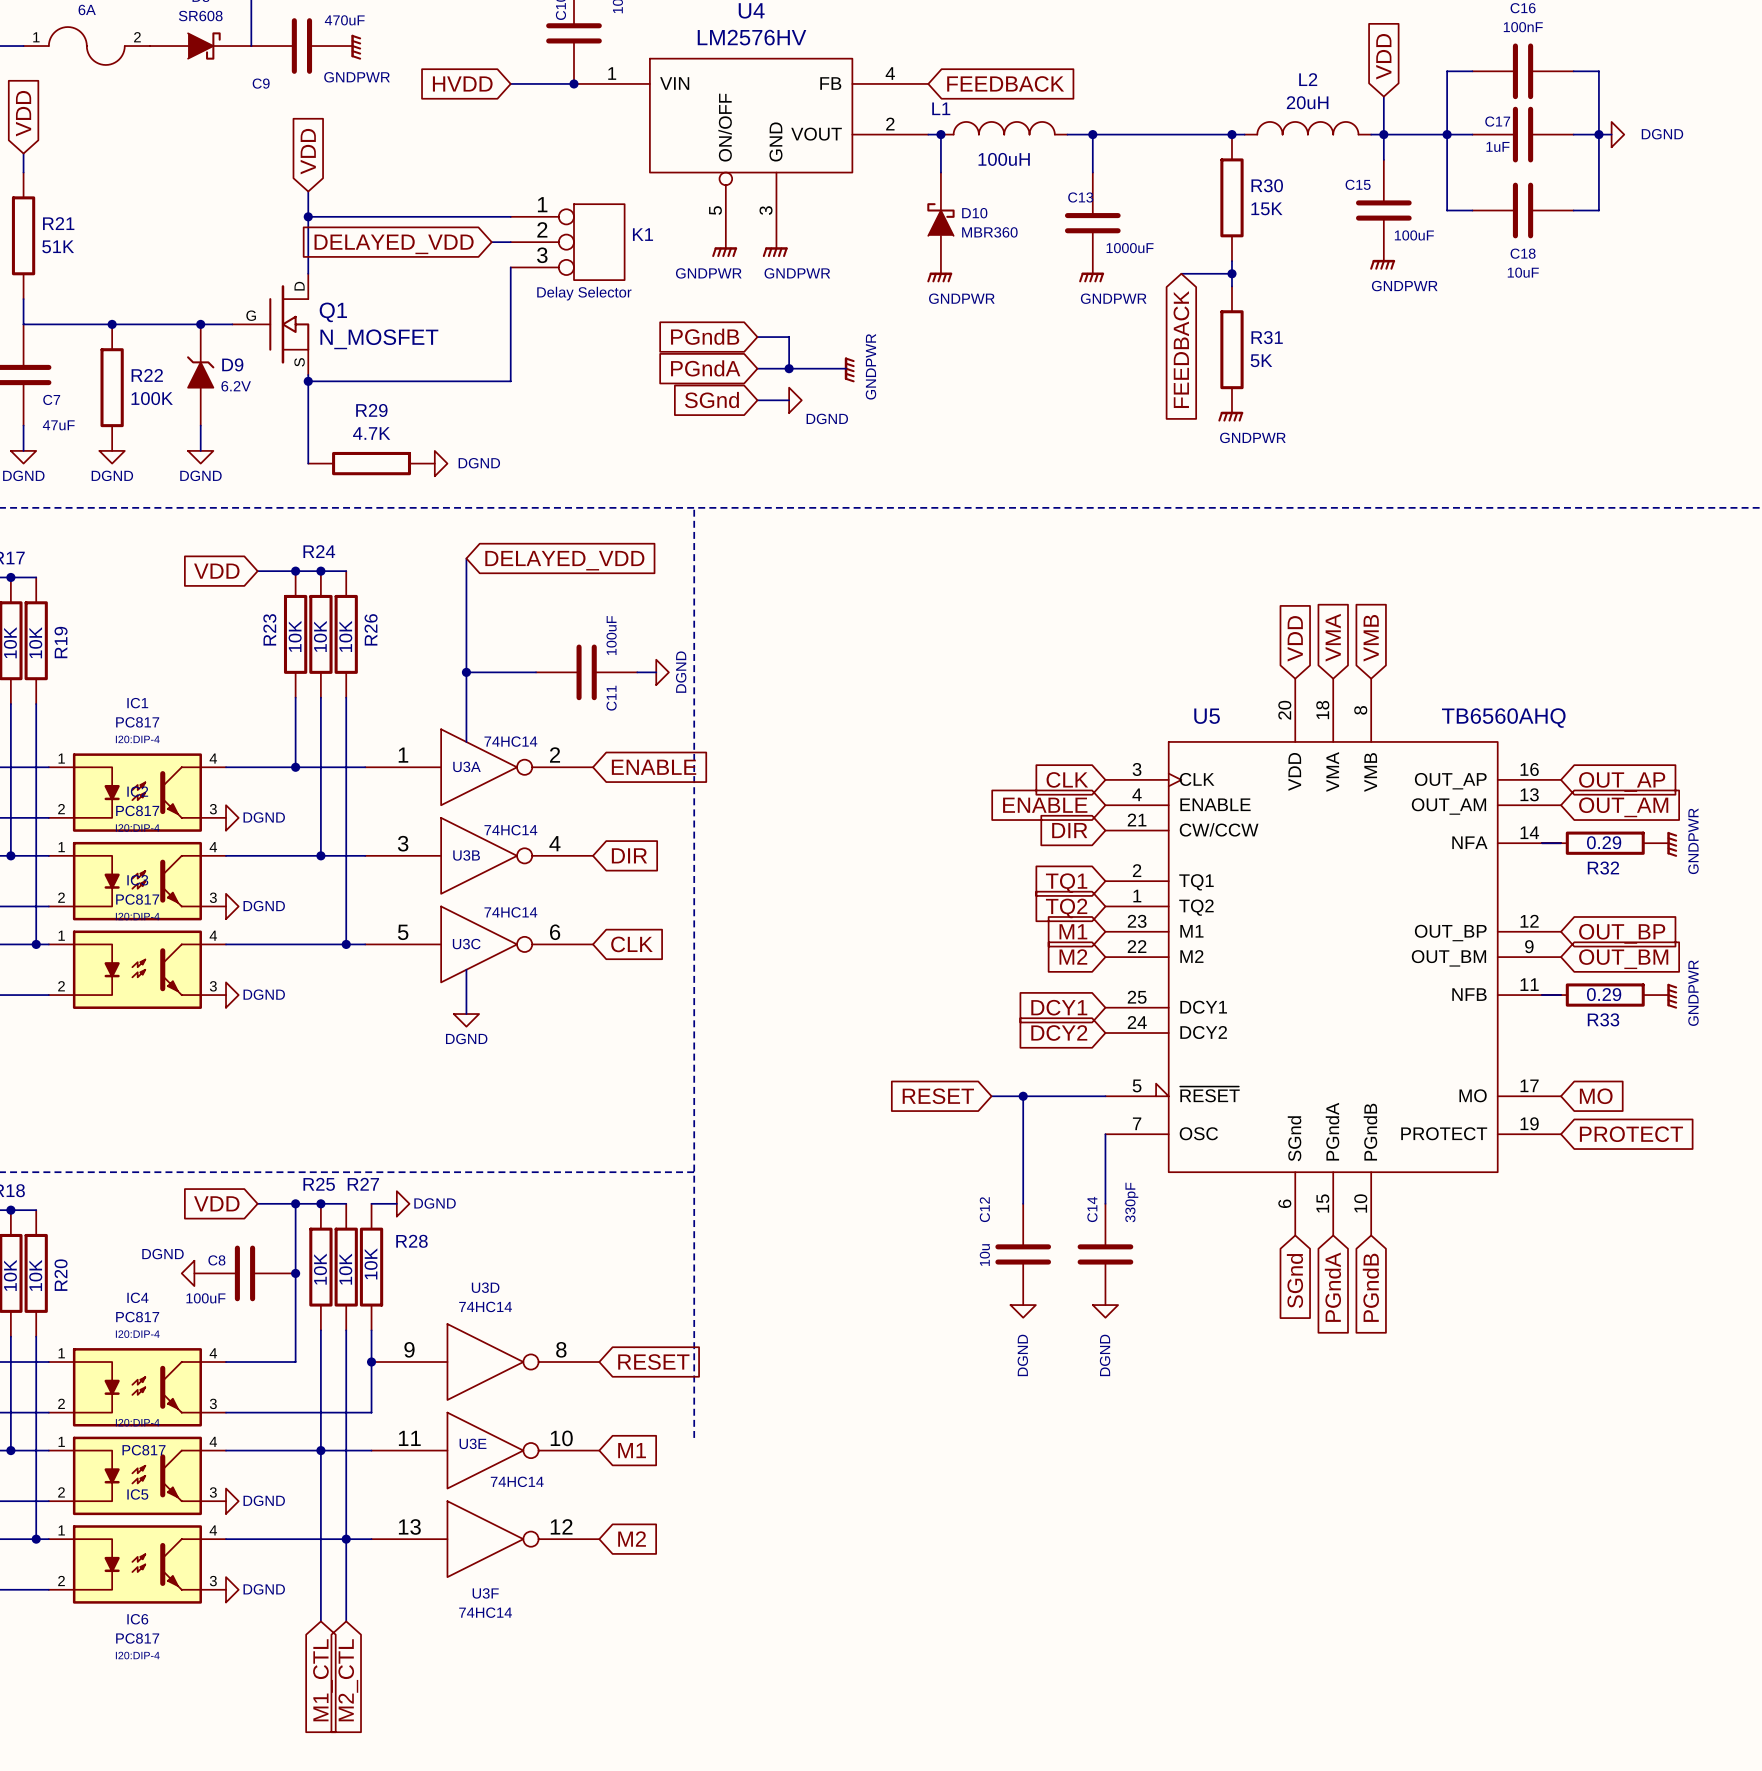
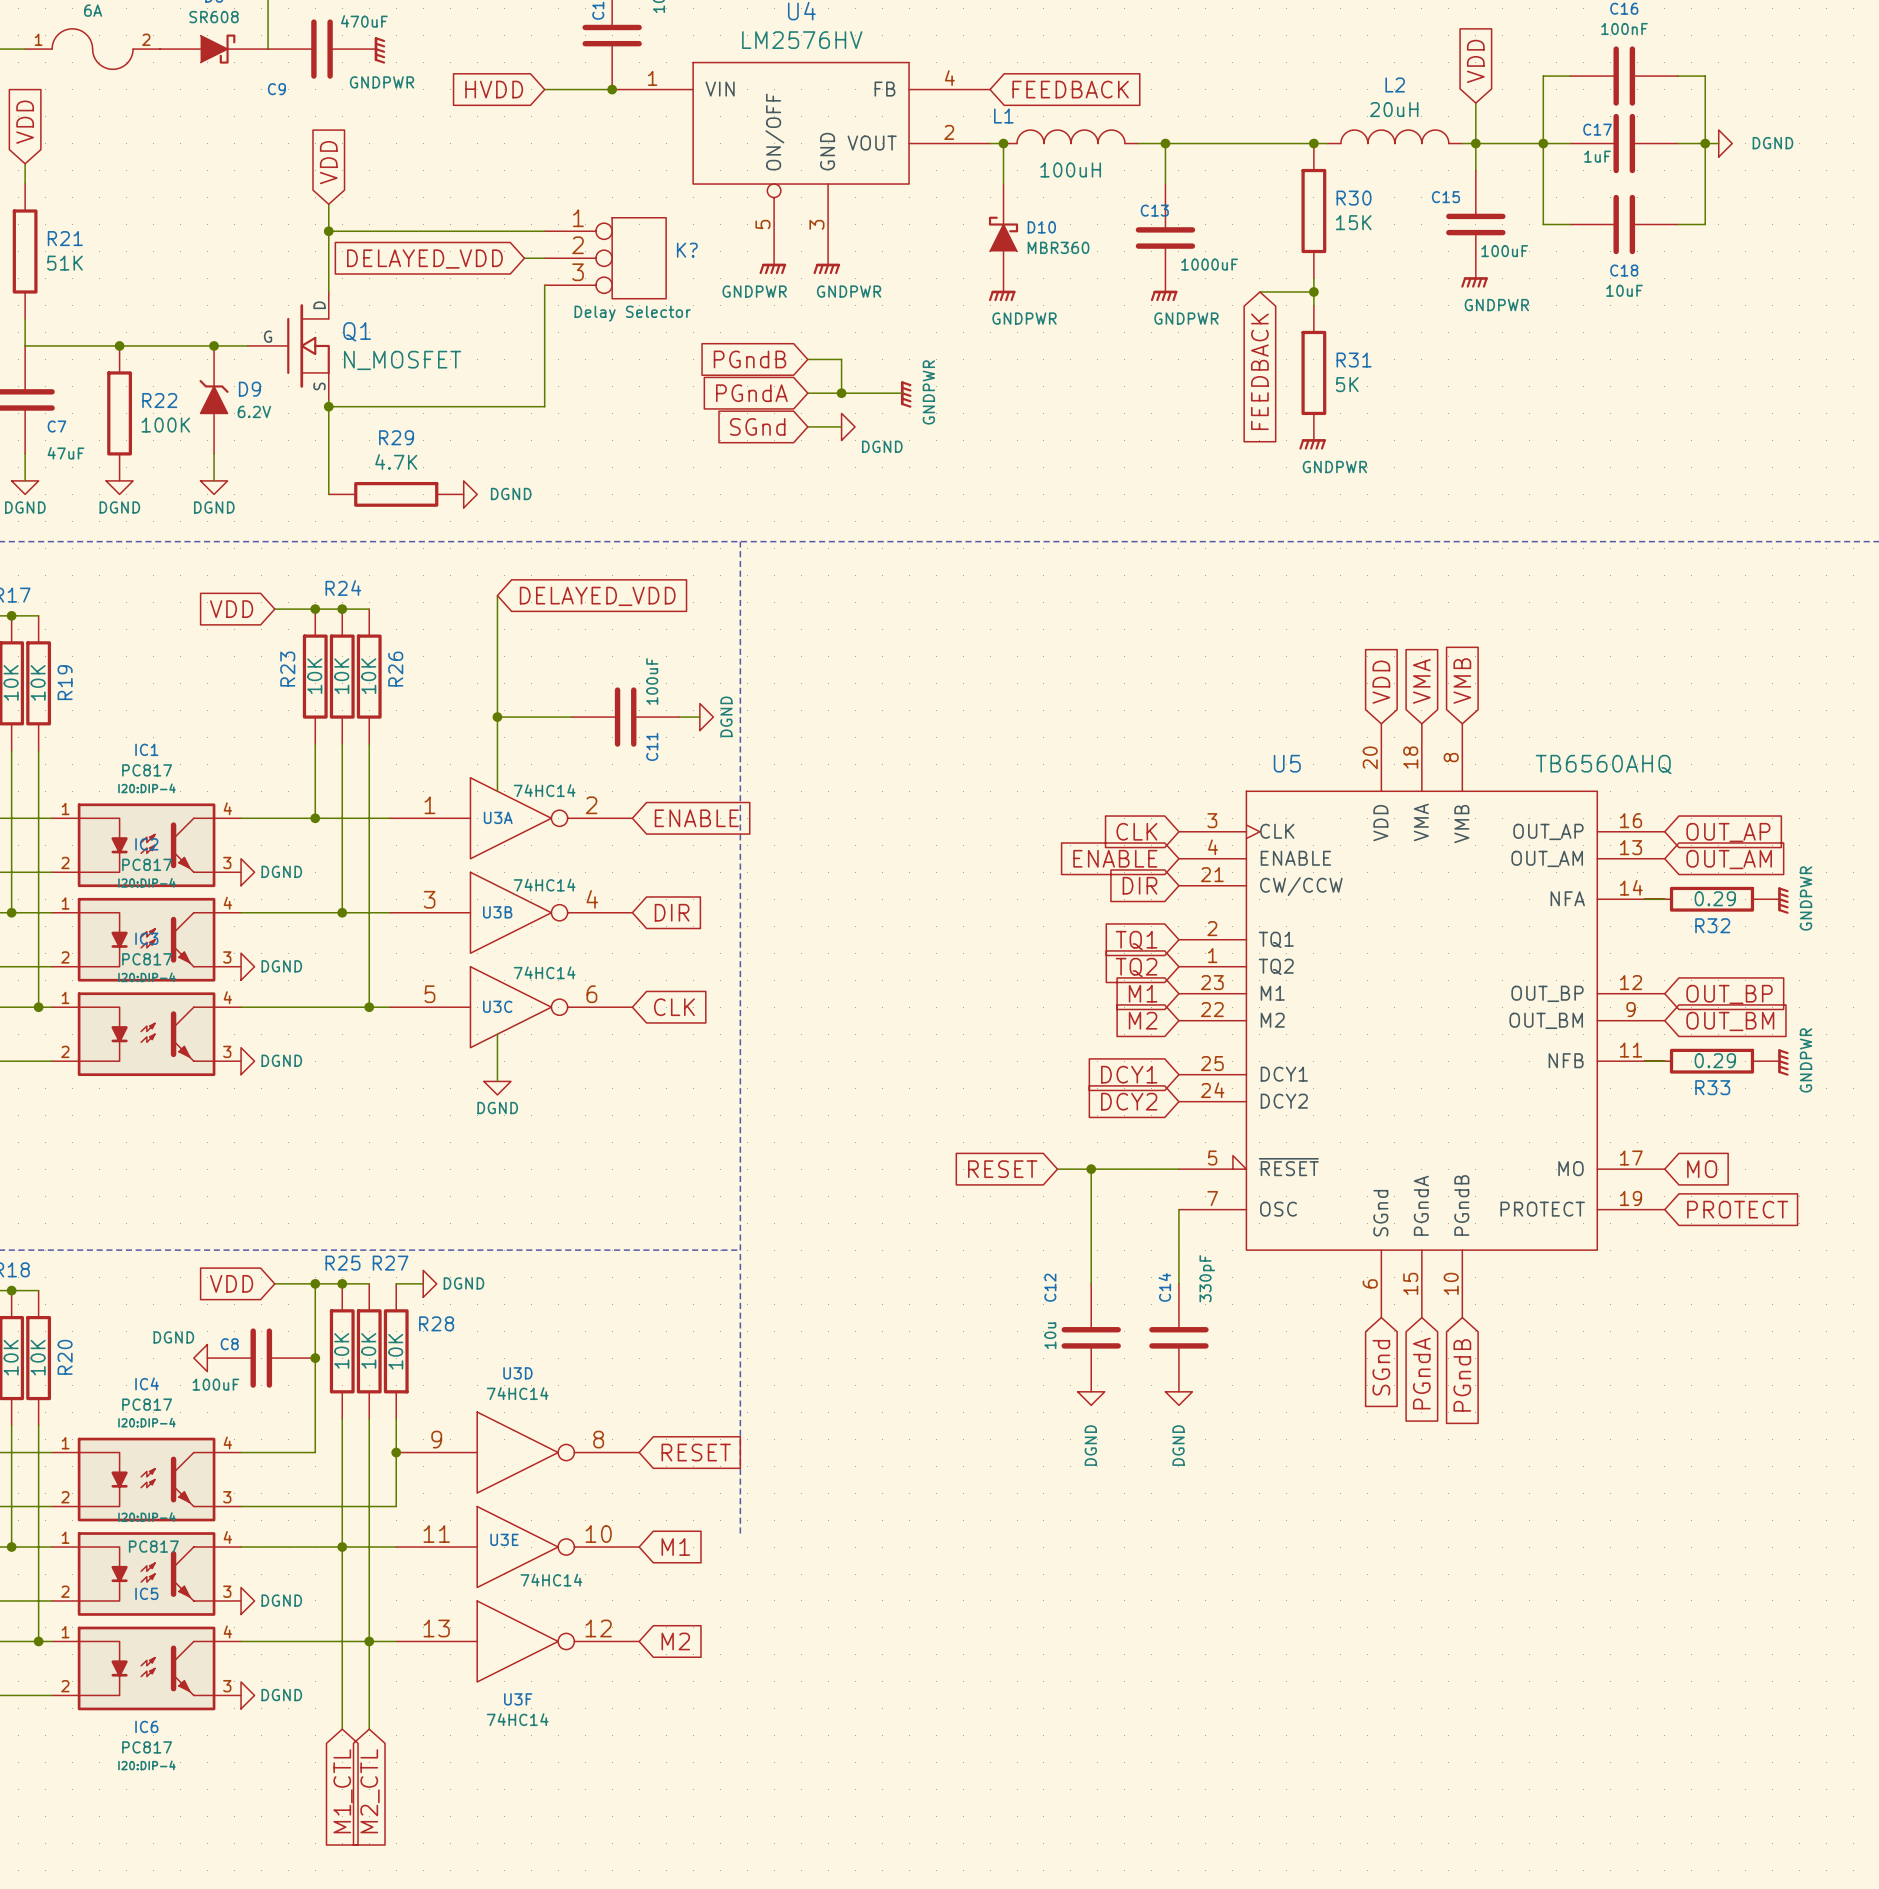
K1 name: K1 (643, 234) -> K? (687, 250)

